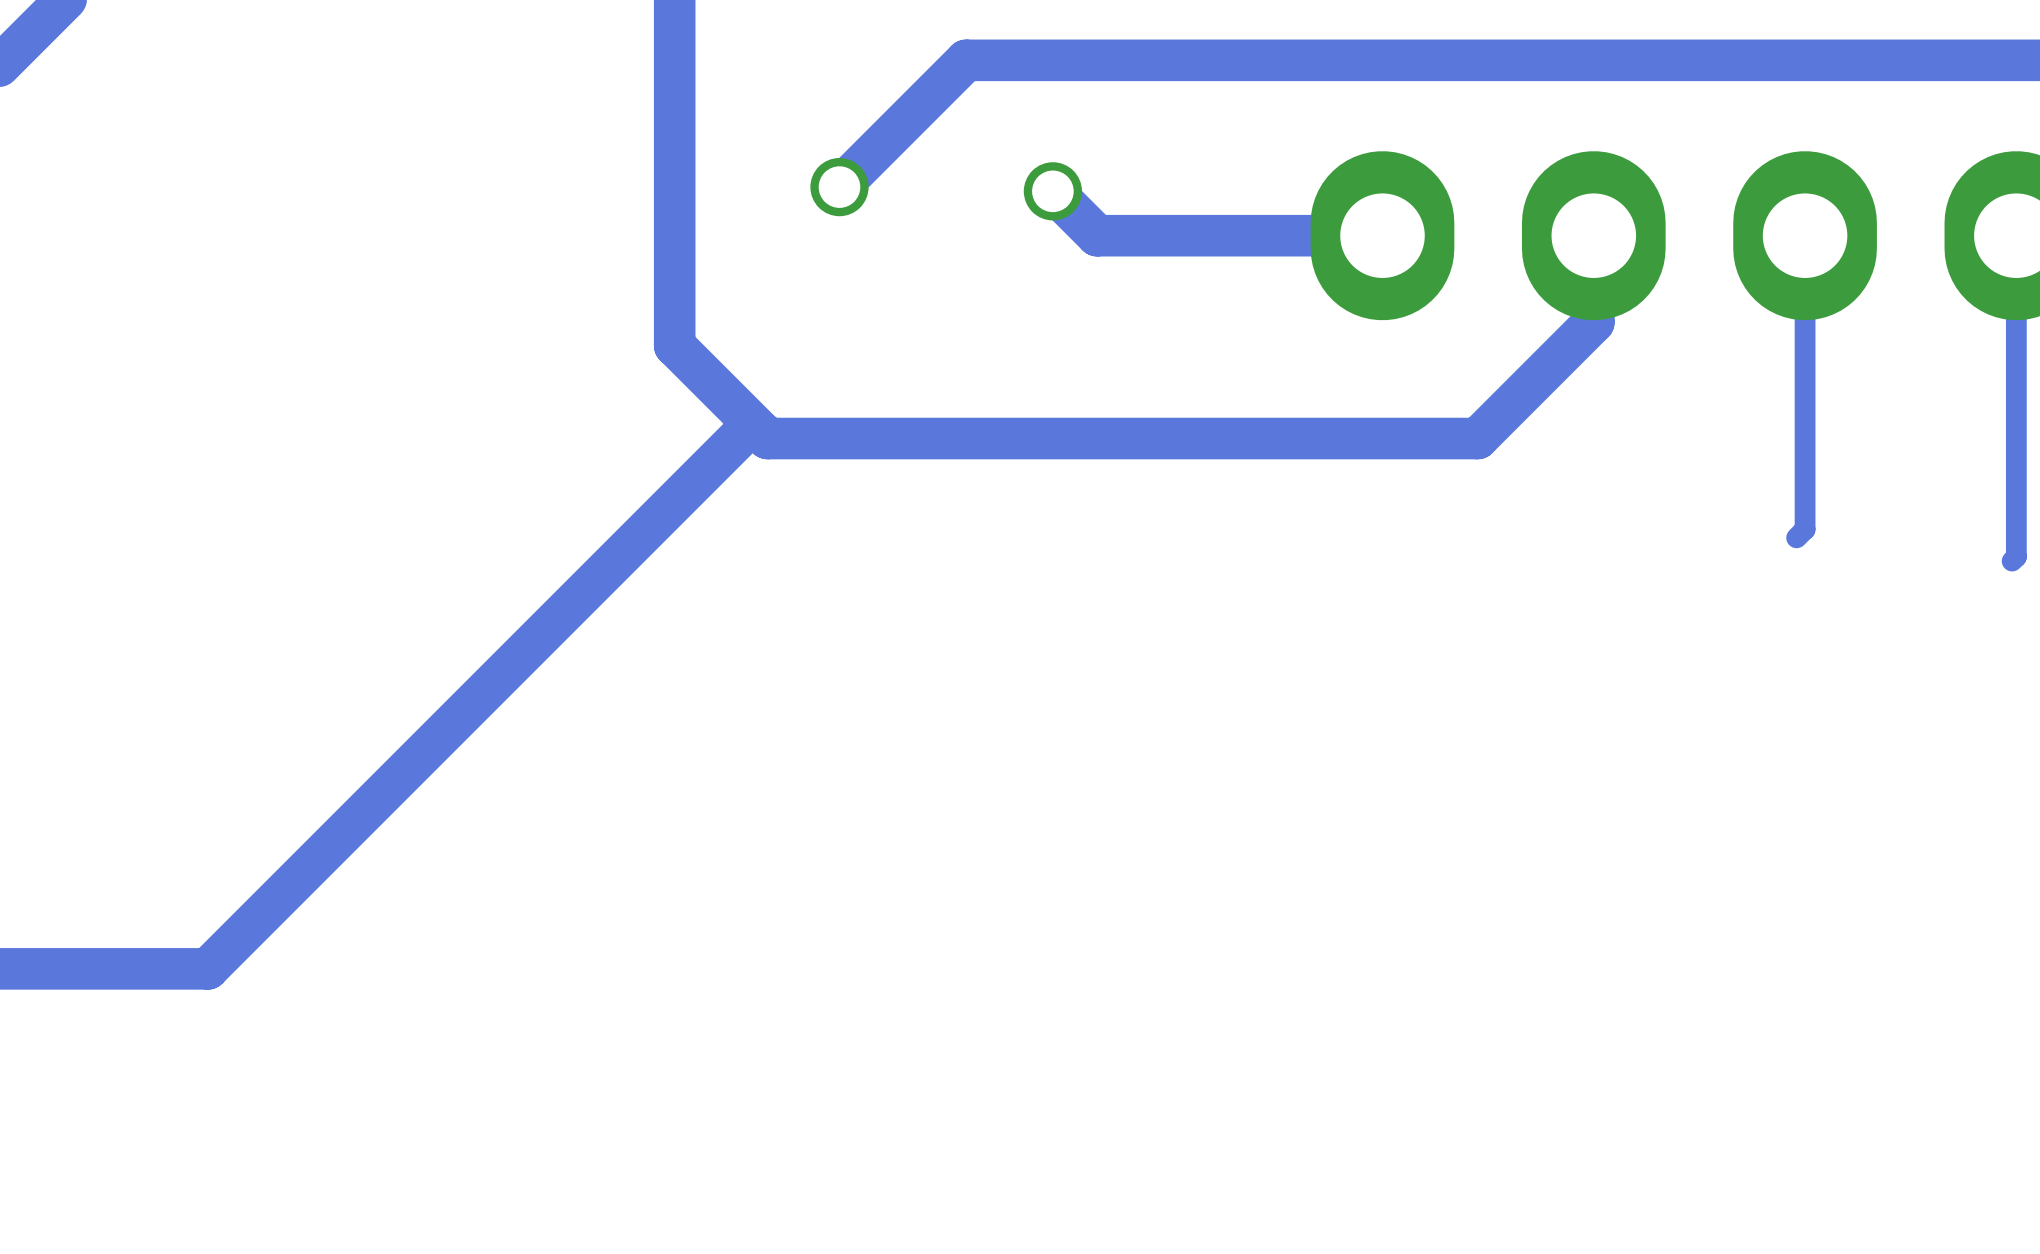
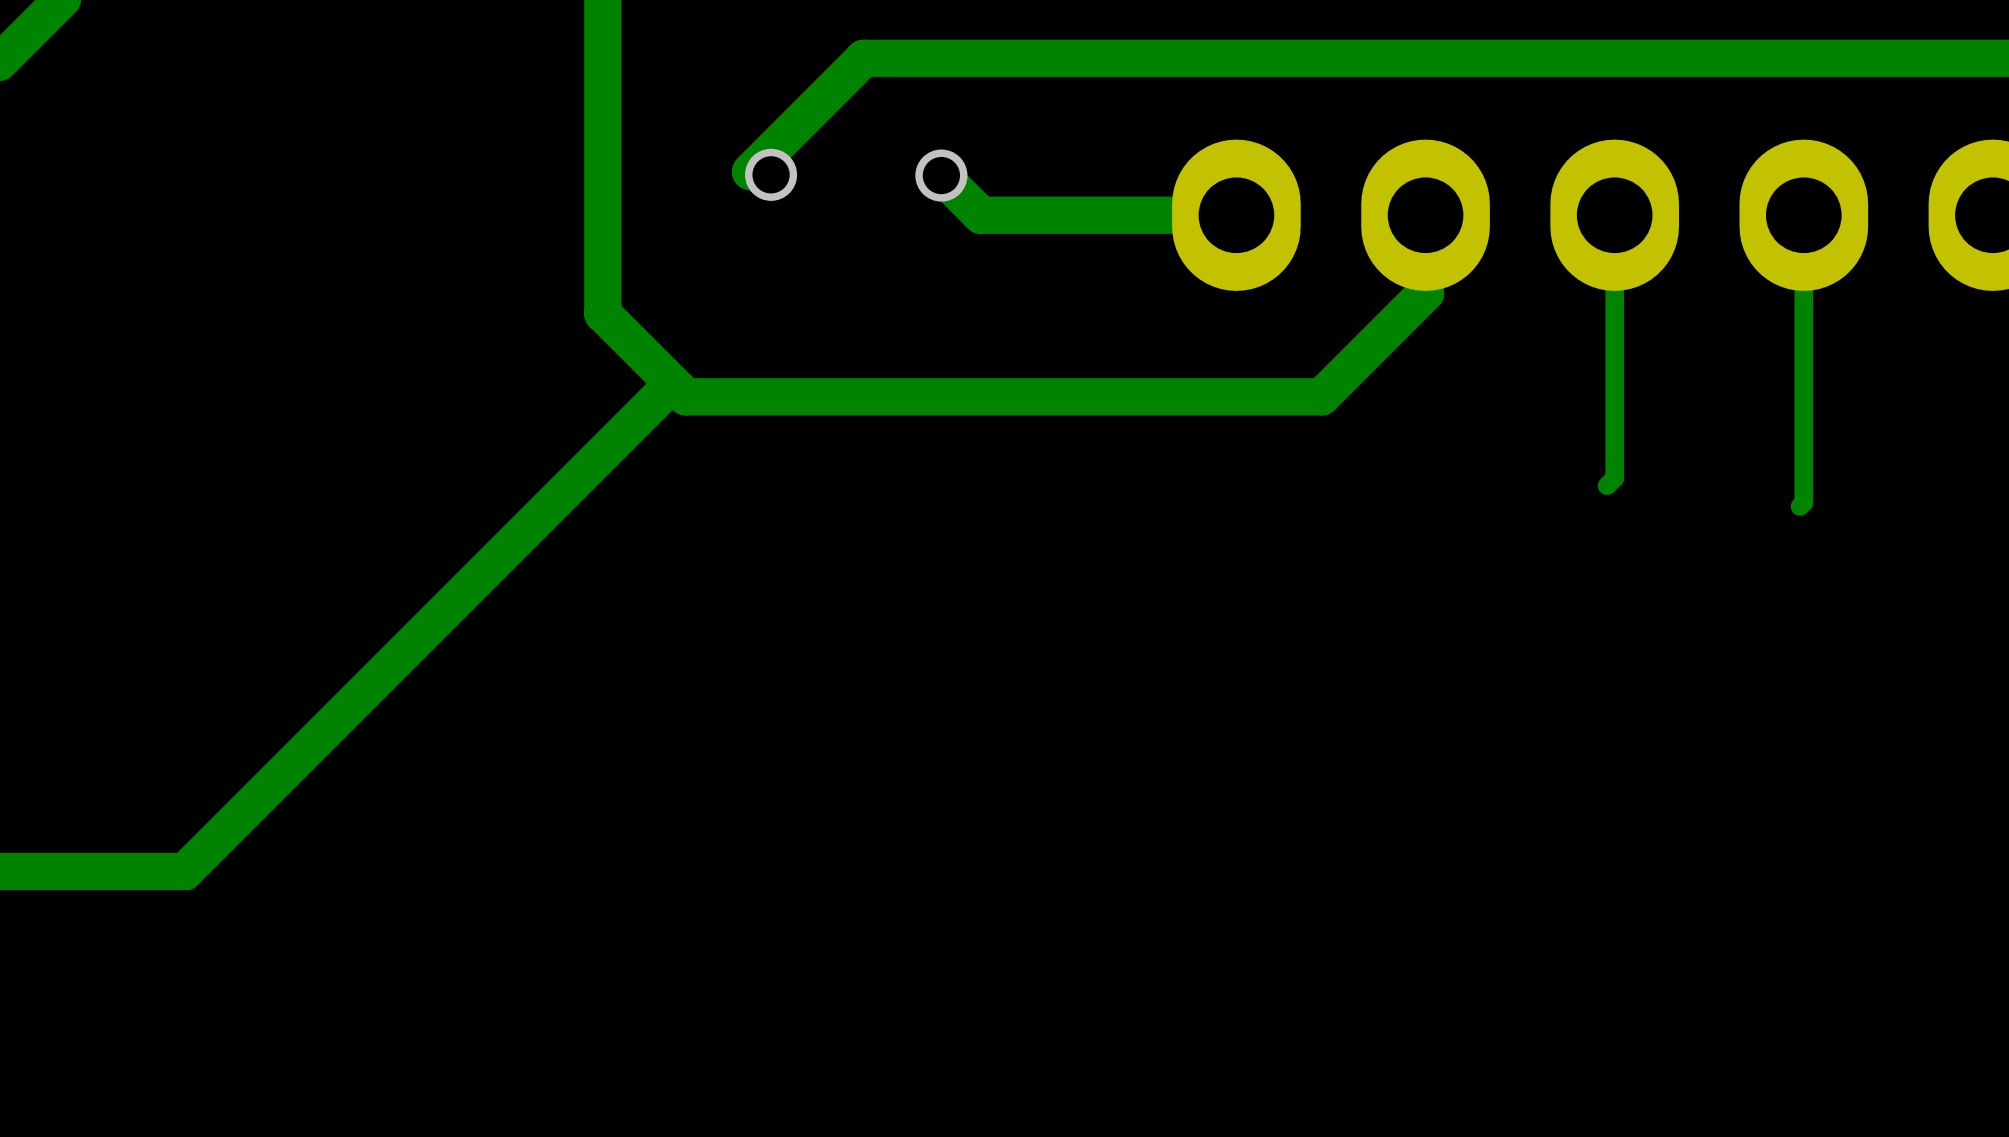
via position: (839, 187) -> (771, 174)

